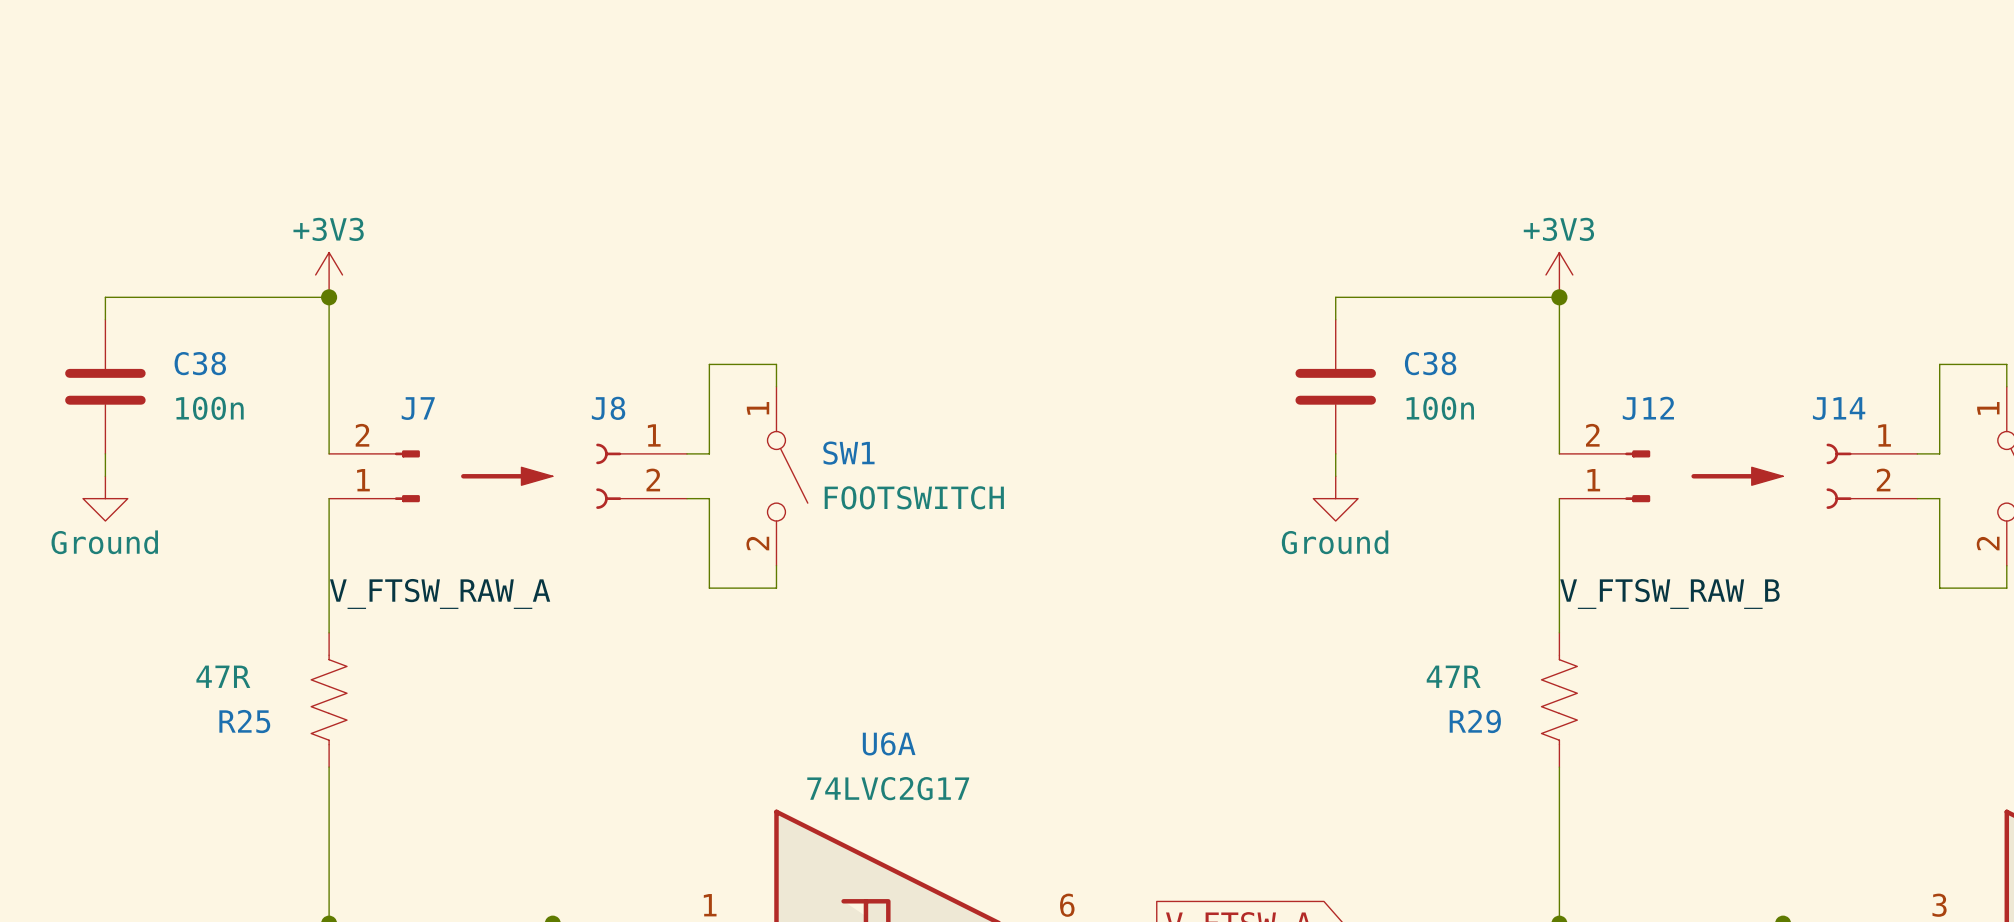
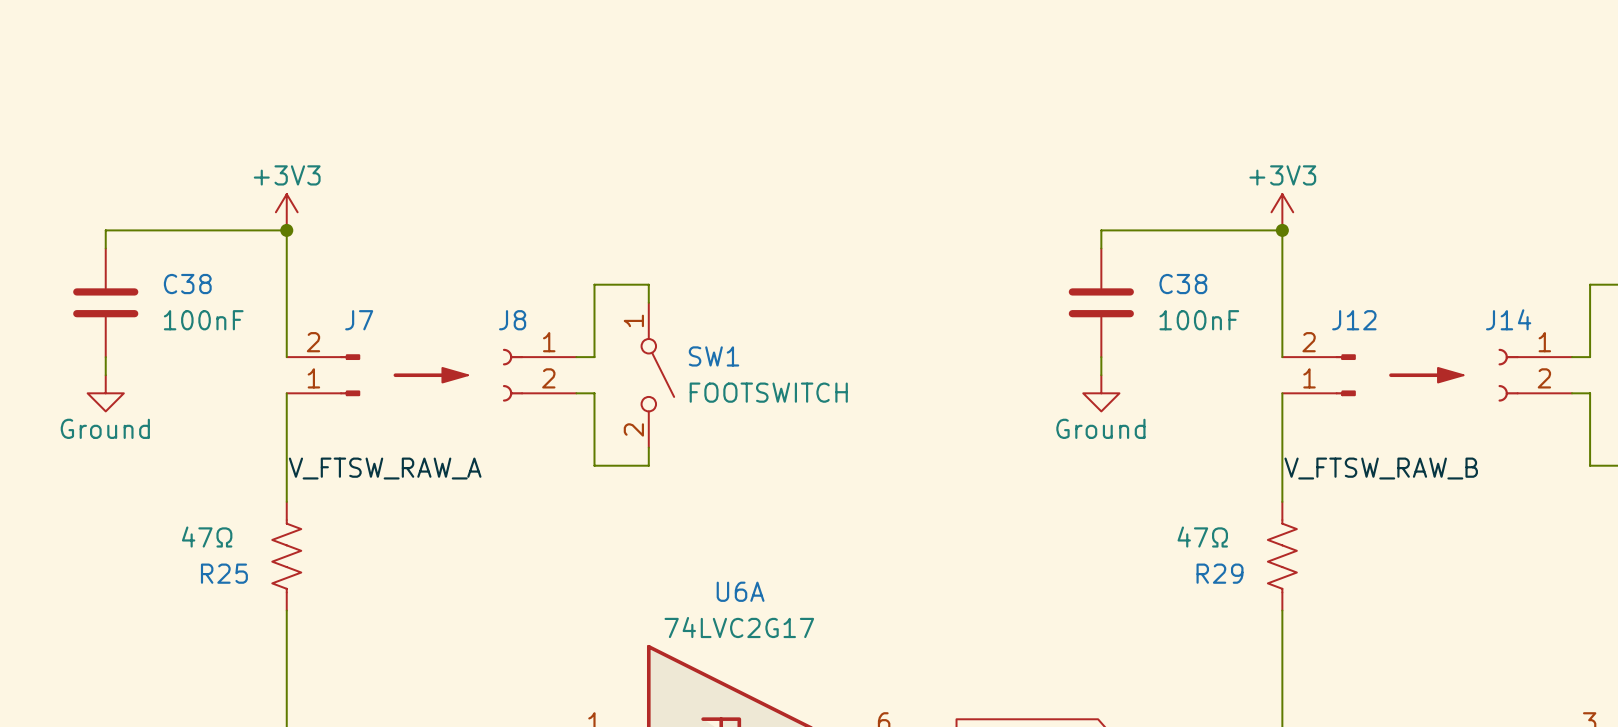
C38 value: 100n (209, 408) -> 100nF (203, 320)
C38 value: 100n (1440, 408) -> 100nF (1199, 320)
R25 value: 47R (223, 676) -> 47Ω (207, 537)
R29 value: 47R (1453, 676) -> 47Ω (1202, 537)

